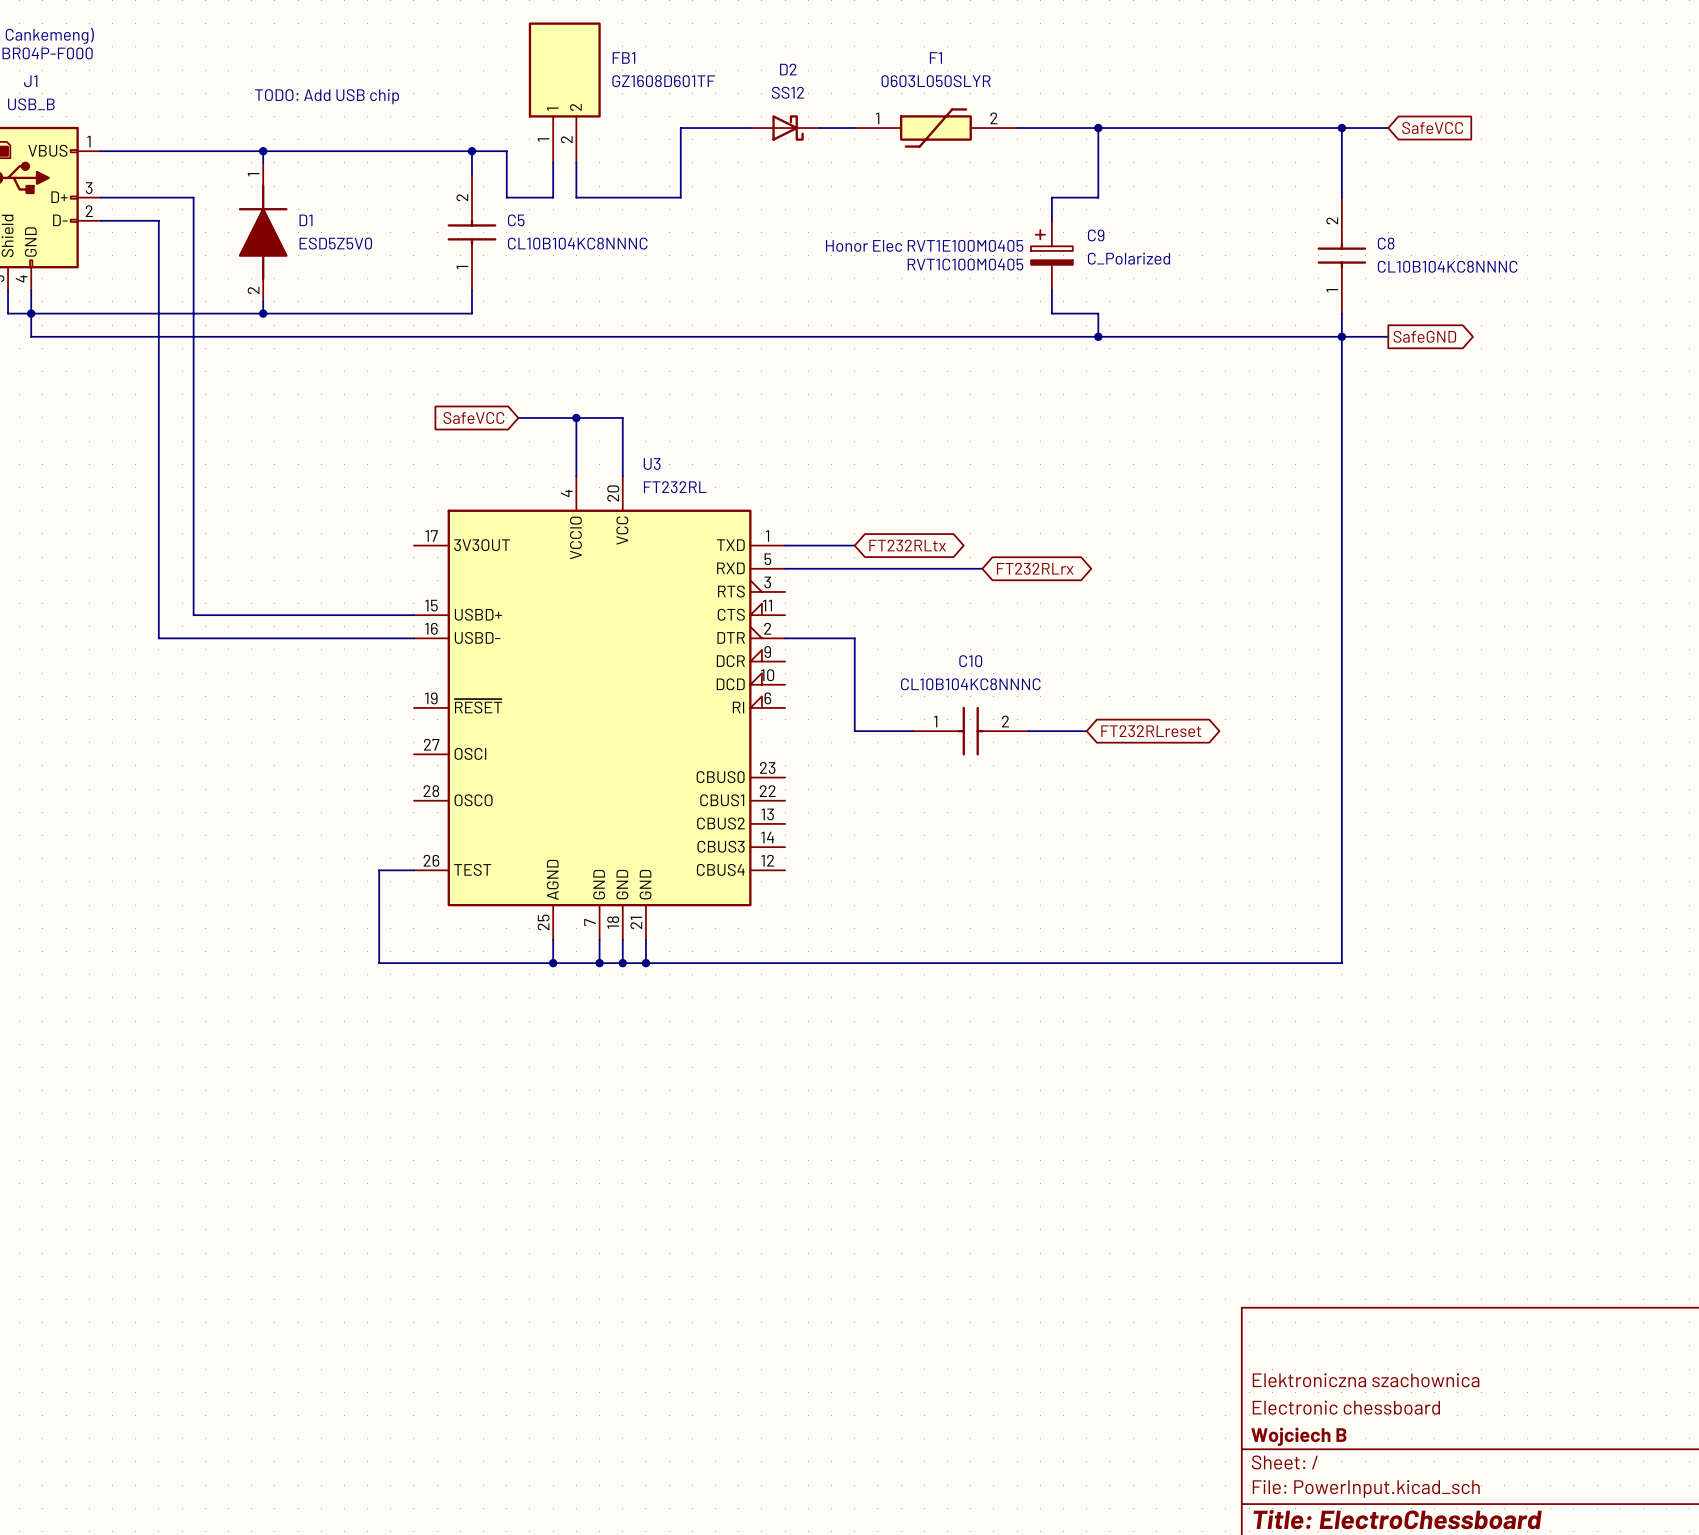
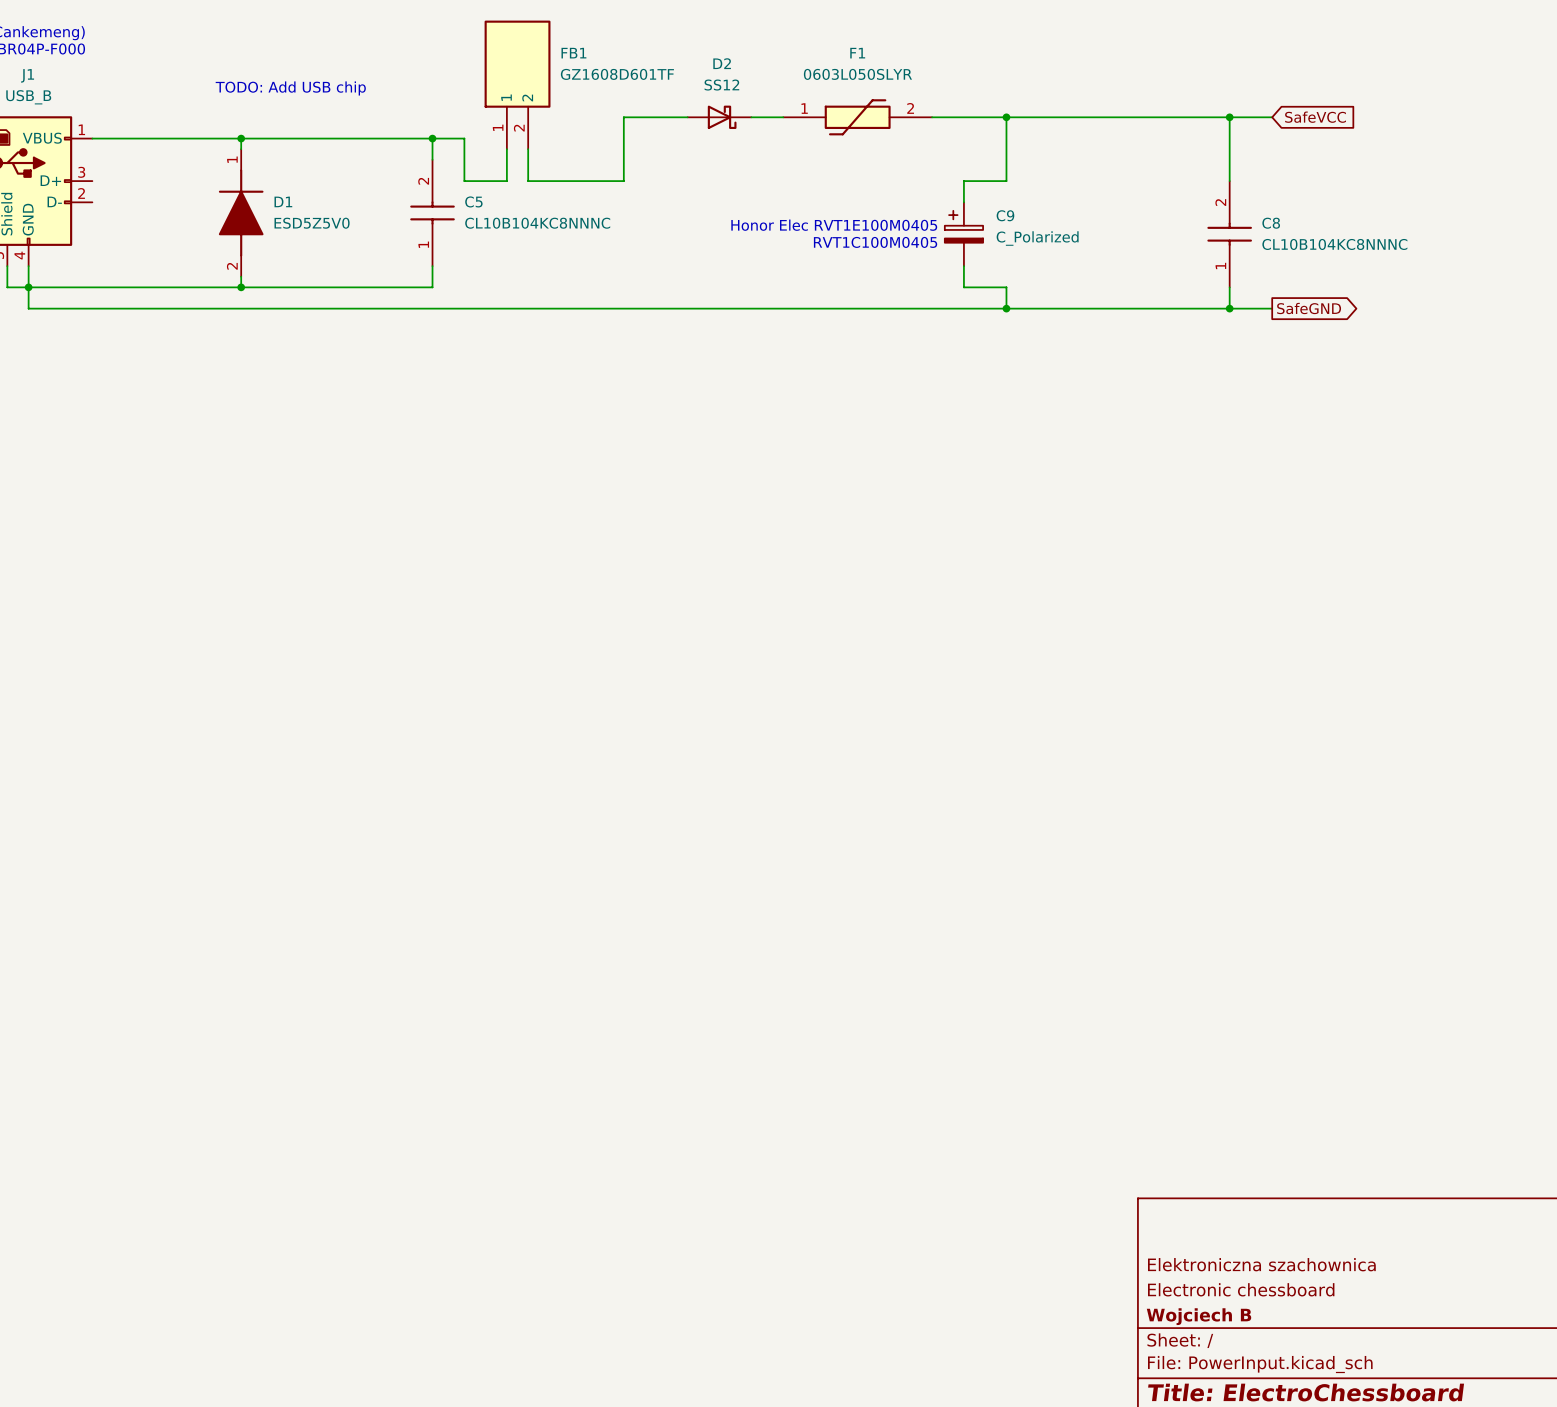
wire: (100, 197) (193, 197) (193, 615) (413, 615) -> none
wire: (100, 220) (158, 220) (158, 638) (413, 638) -> none
wire: (1341, 336) (1341, 963) (379, 963) (379, 870) (413, 870) -> none
global label: SafeVCC (473, 417) -> none
wire: (518, 417) (622, 417) (622, 475) -> none
wire: (576, 417) (576, 475) -> none
junction: (576, 417) -> none
wire: (785, 545) (854, 545) -> none
global label: FT232RLtx (907, 545) -> none
wire: (785, 568) (982, 568) -> none
global label: FT232RLrx (1035, 568) -> none
wire: (785, 638) (854, 638) (854, 731) (912, 731) -> none
U3: FT232RL (599, 707) -> none
C10: CL10B104KC8NNNC (970, 731) -> none
wire: (1028, 731) (1086, 731) -> none
global label: FT232RLreset (1151, 731) -> none
wire: (553, 939) (553, 963) -> none
wire: (599, 939) (599, 963) -> none
wire: (622, 939) (622, 963) -> none
wire: (645, 939) (645, 963) -> none
junction: (553, 963) -> none
junction: (599, 963) -> none
junction: (622, 963) -> none
junction: (645, 963) -> none

